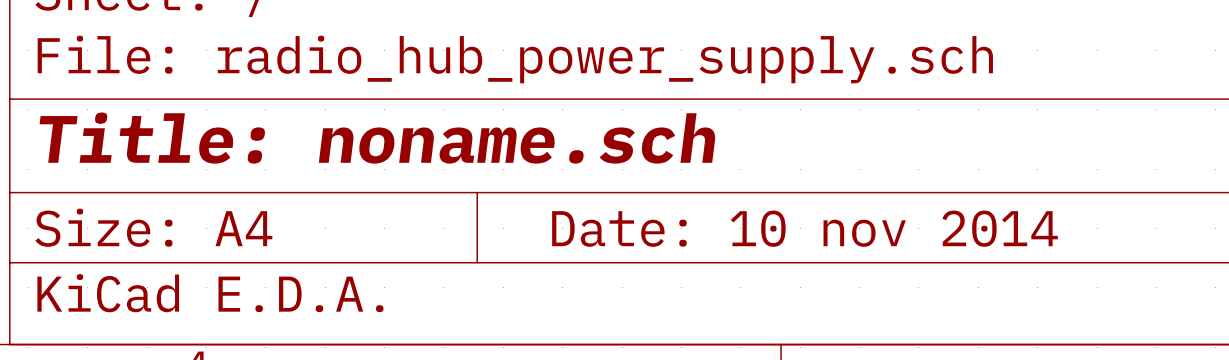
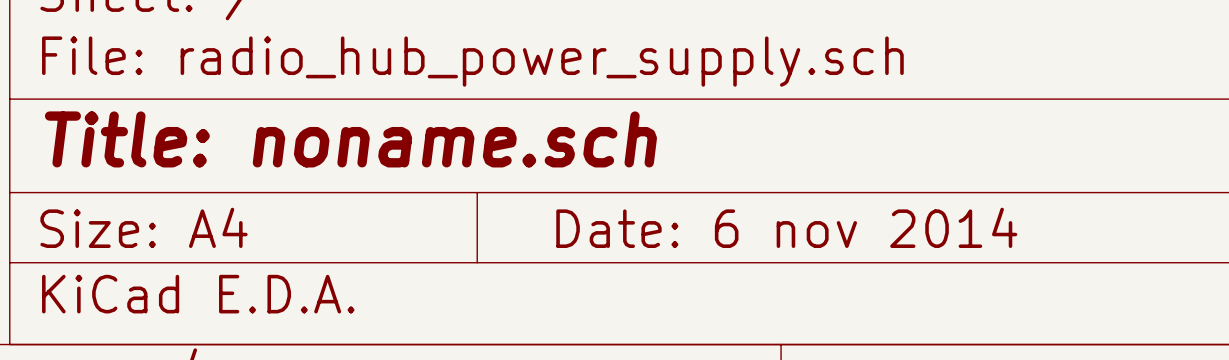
title block: Date: 10 nov 2014 (804, 228) -> Date: 6 nov 2014 (786, 227)

